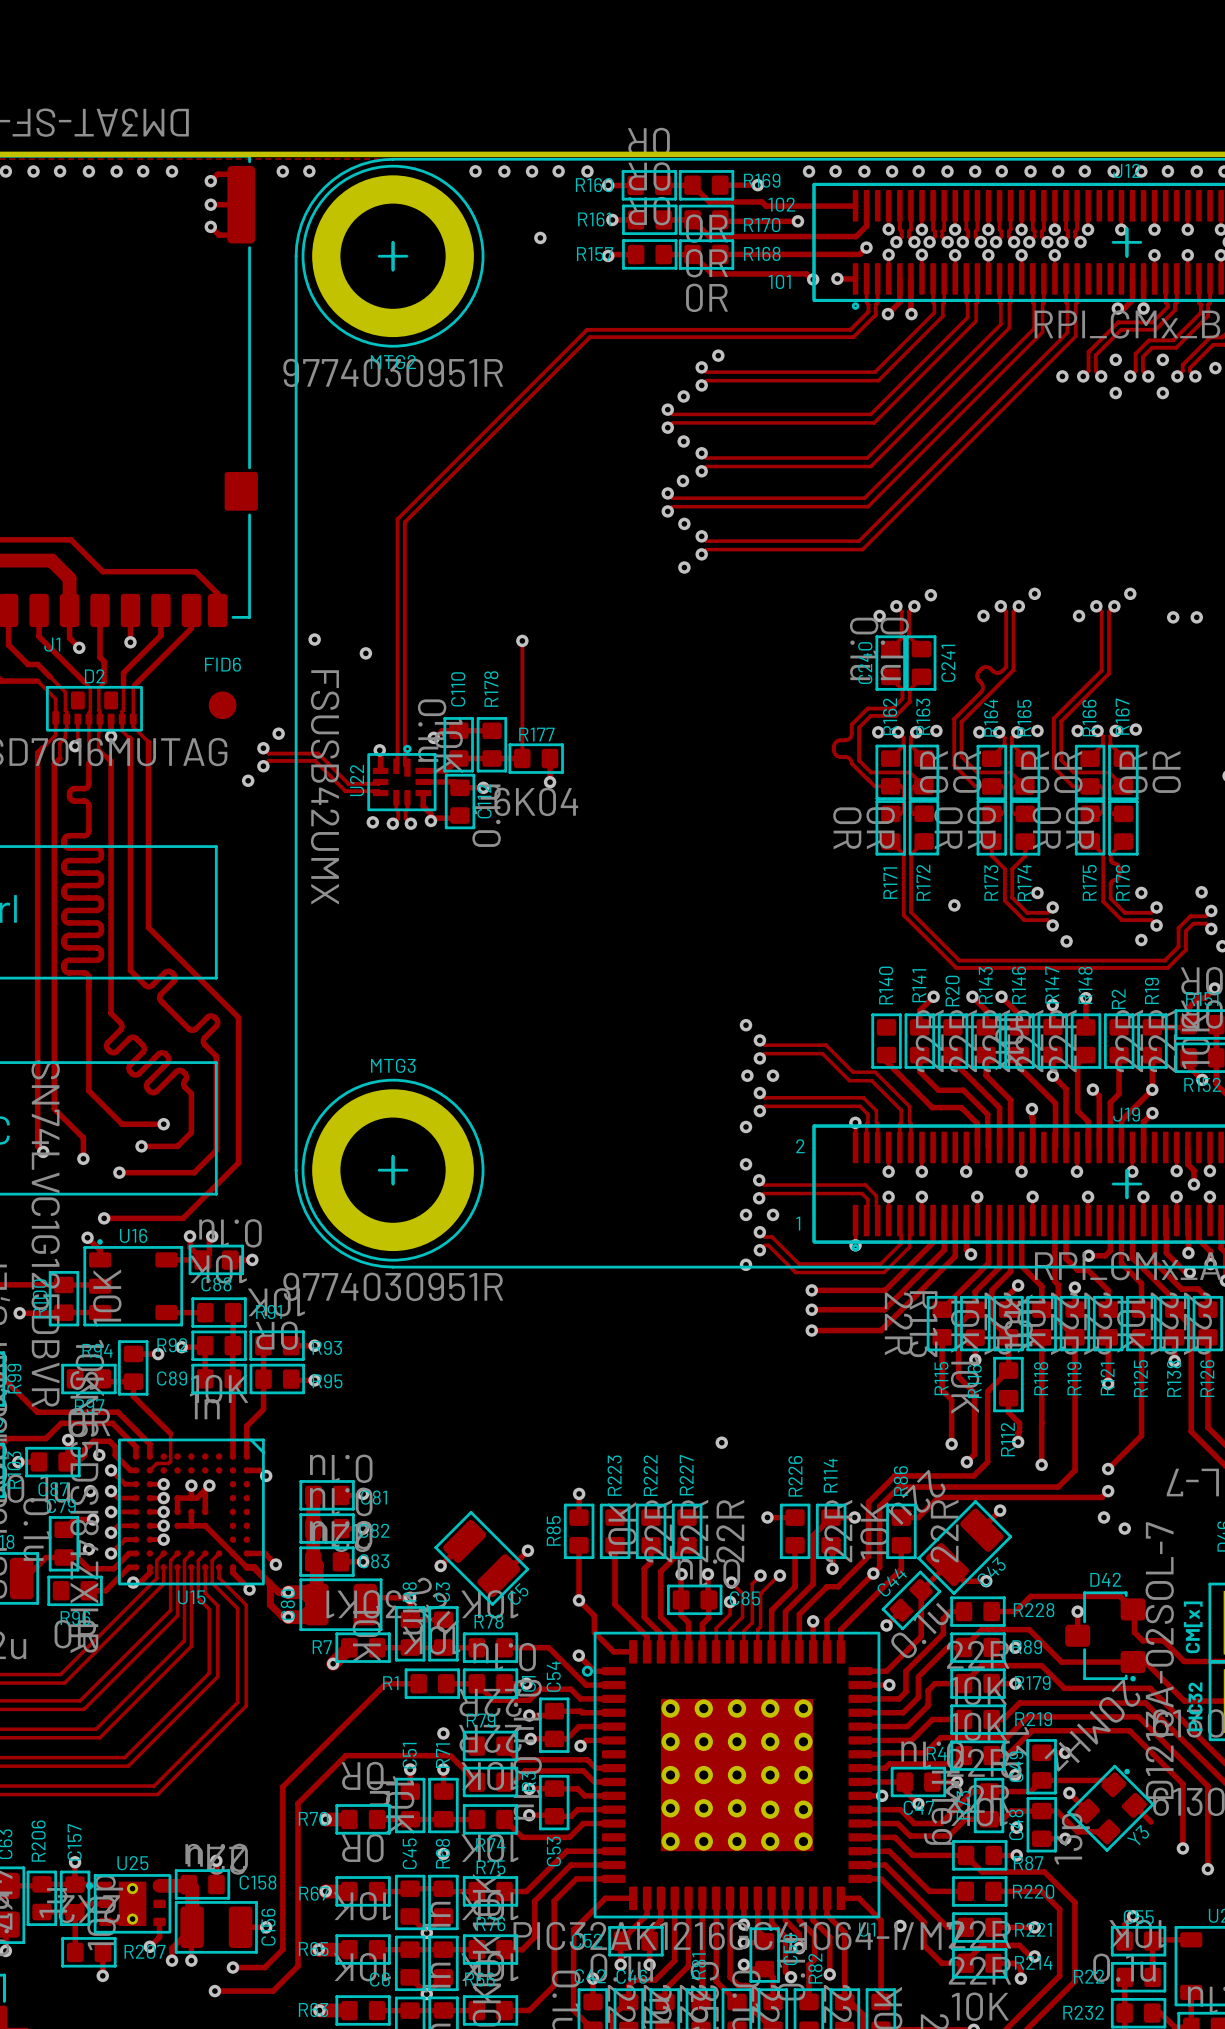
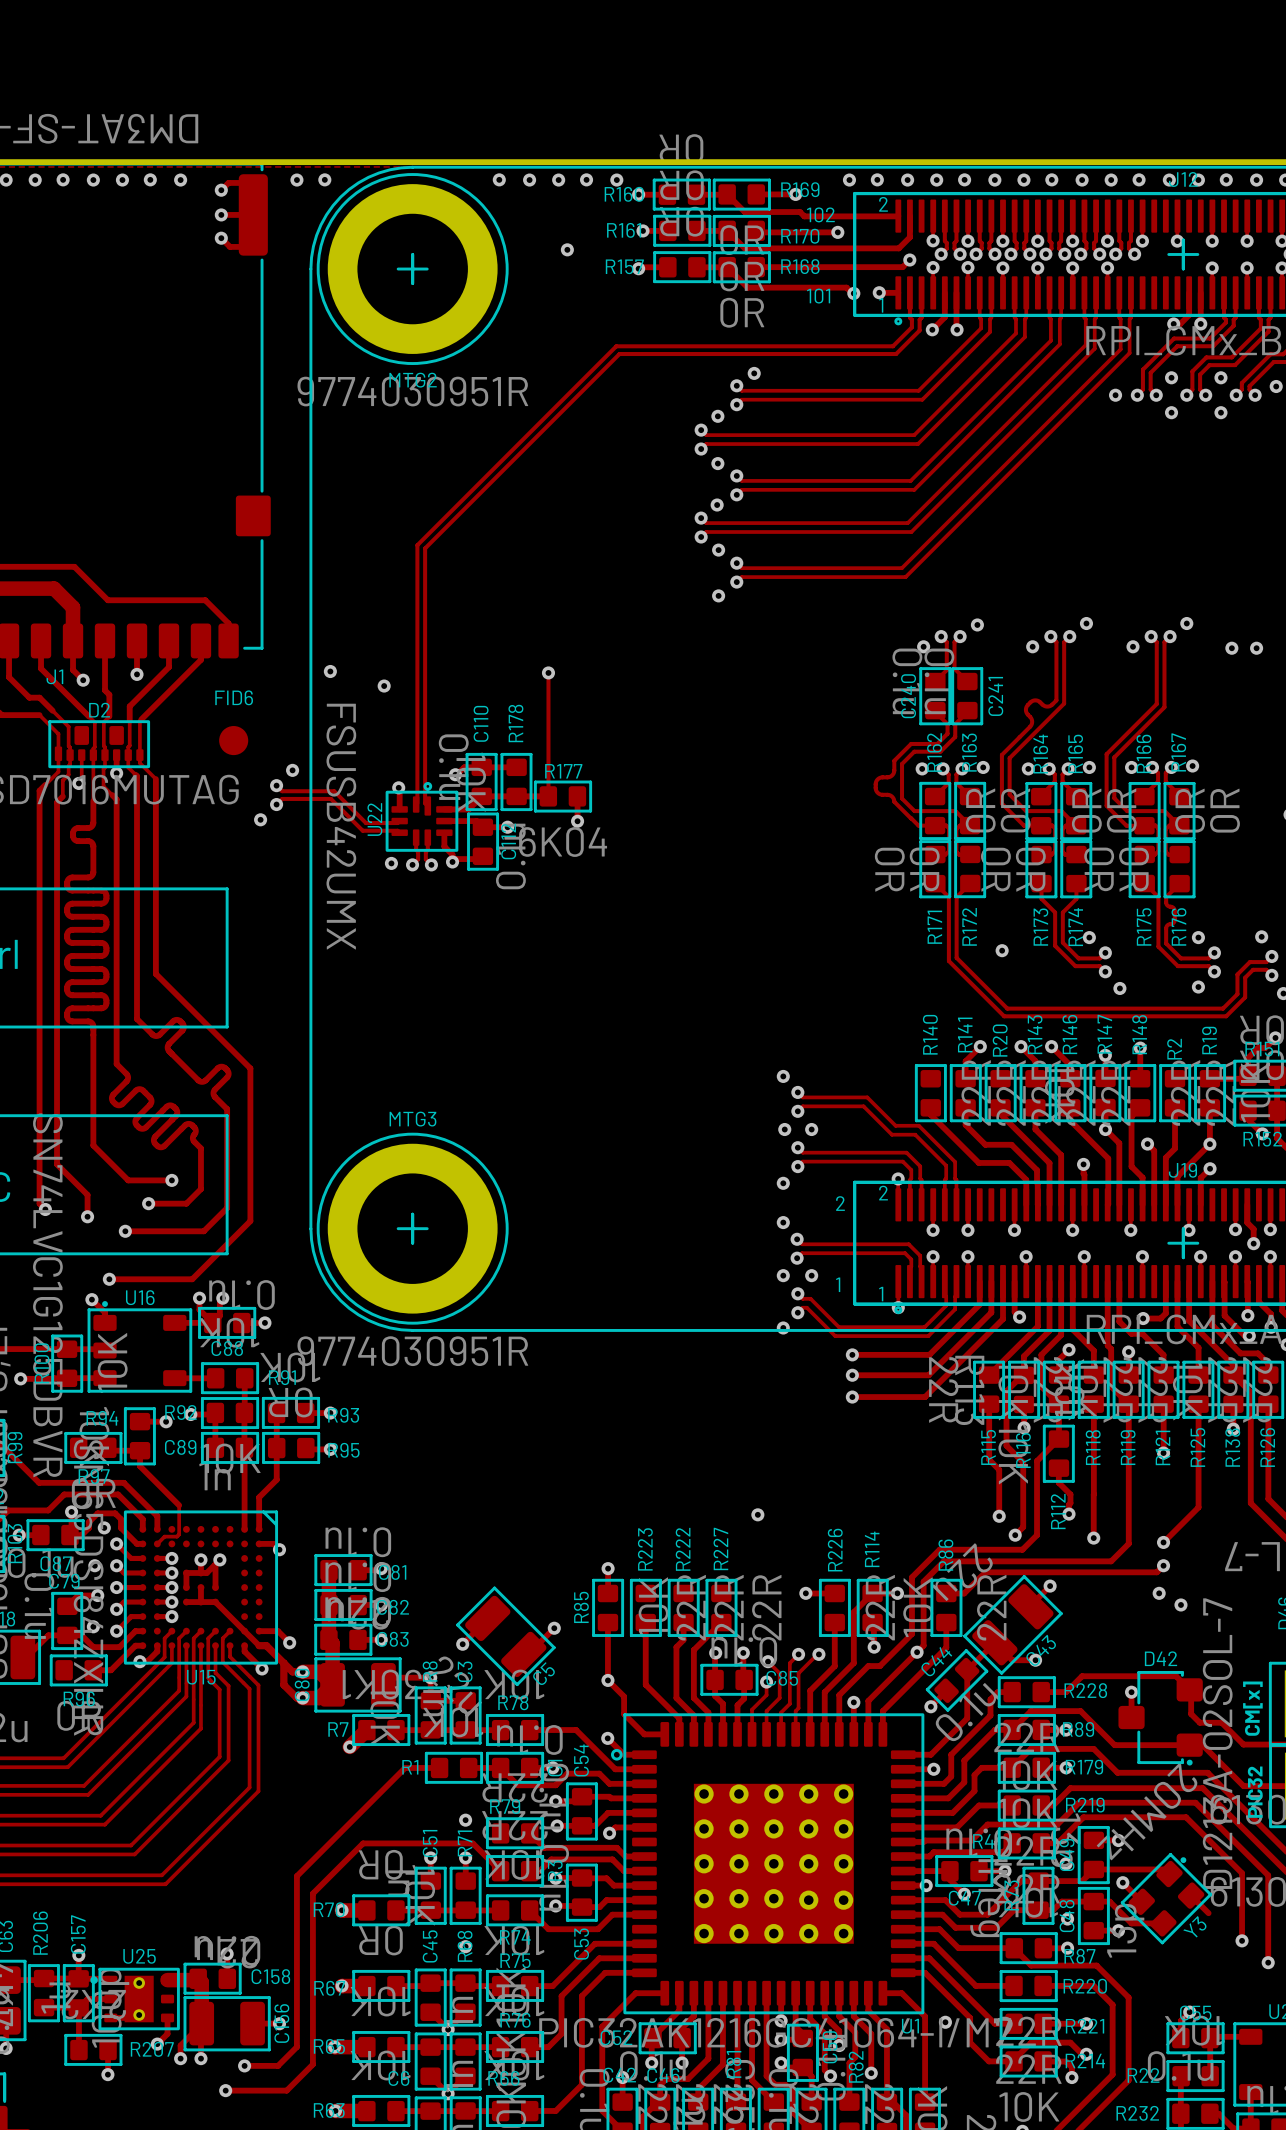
J12 text: none -> 2 (883, 204)
J12 text: none -> 1 (881, 305)
J19 text: none -> 2 (883, 1193)
J19 text: none -> 1 (881, 1294)

